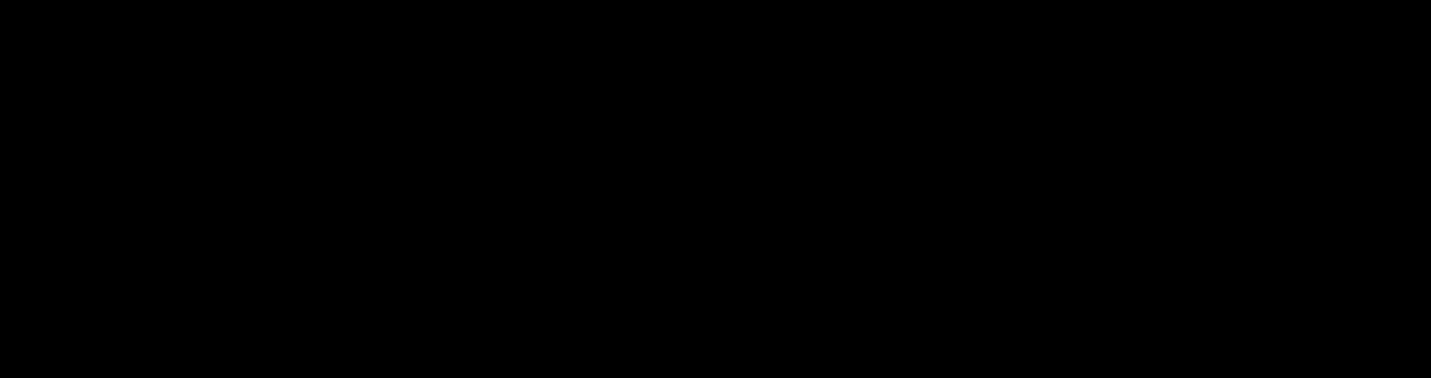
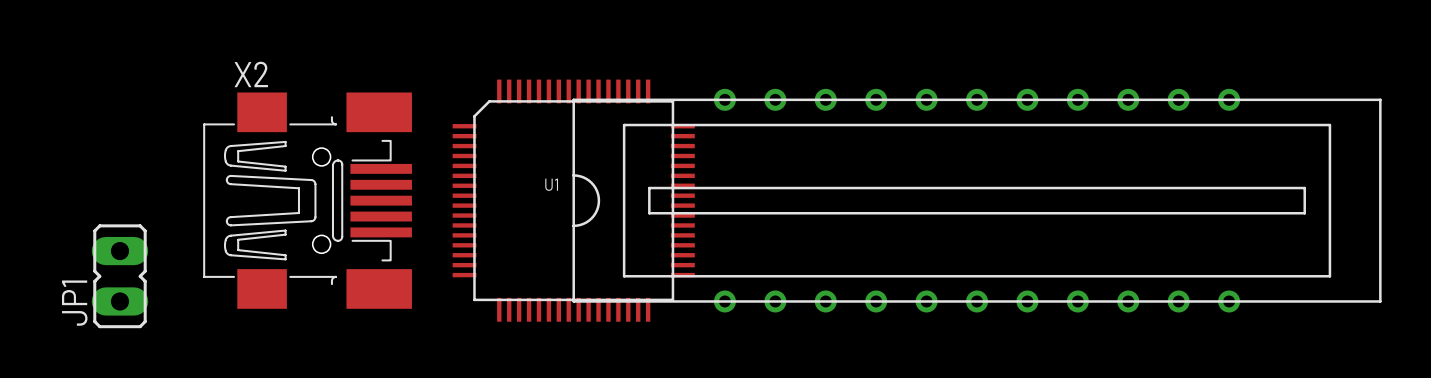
X2: none -> (307, 200)
U1: none -> (573, 200)
part: none -> (977, 200)
JP1: none -> (119, 276)

